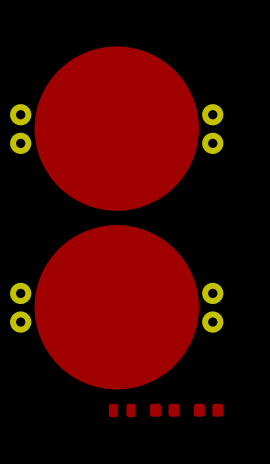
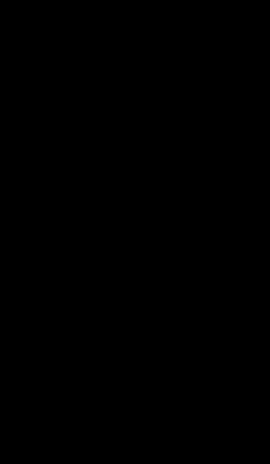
part: (116, 128) -> none
part: (116, 307) -> none
part: (122, 410) -> none
part: (164, 410) -> none
part: (208, 410) -> none

